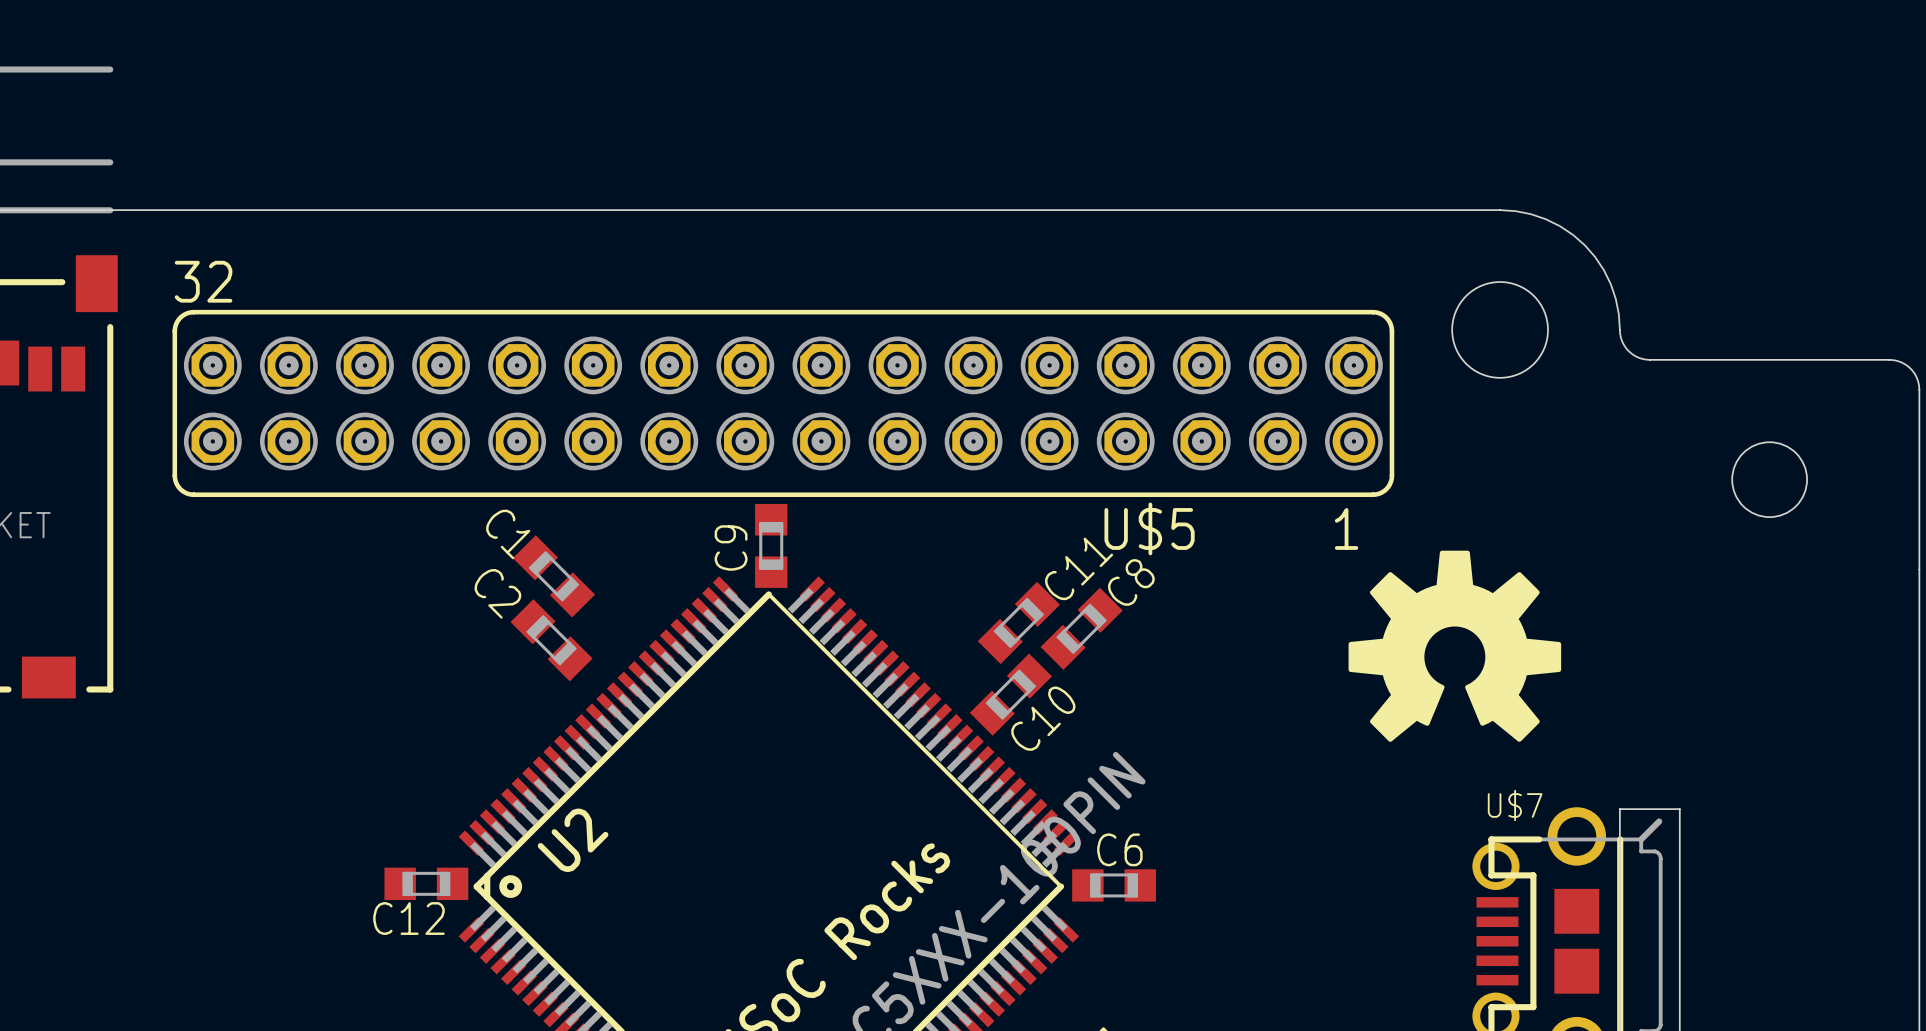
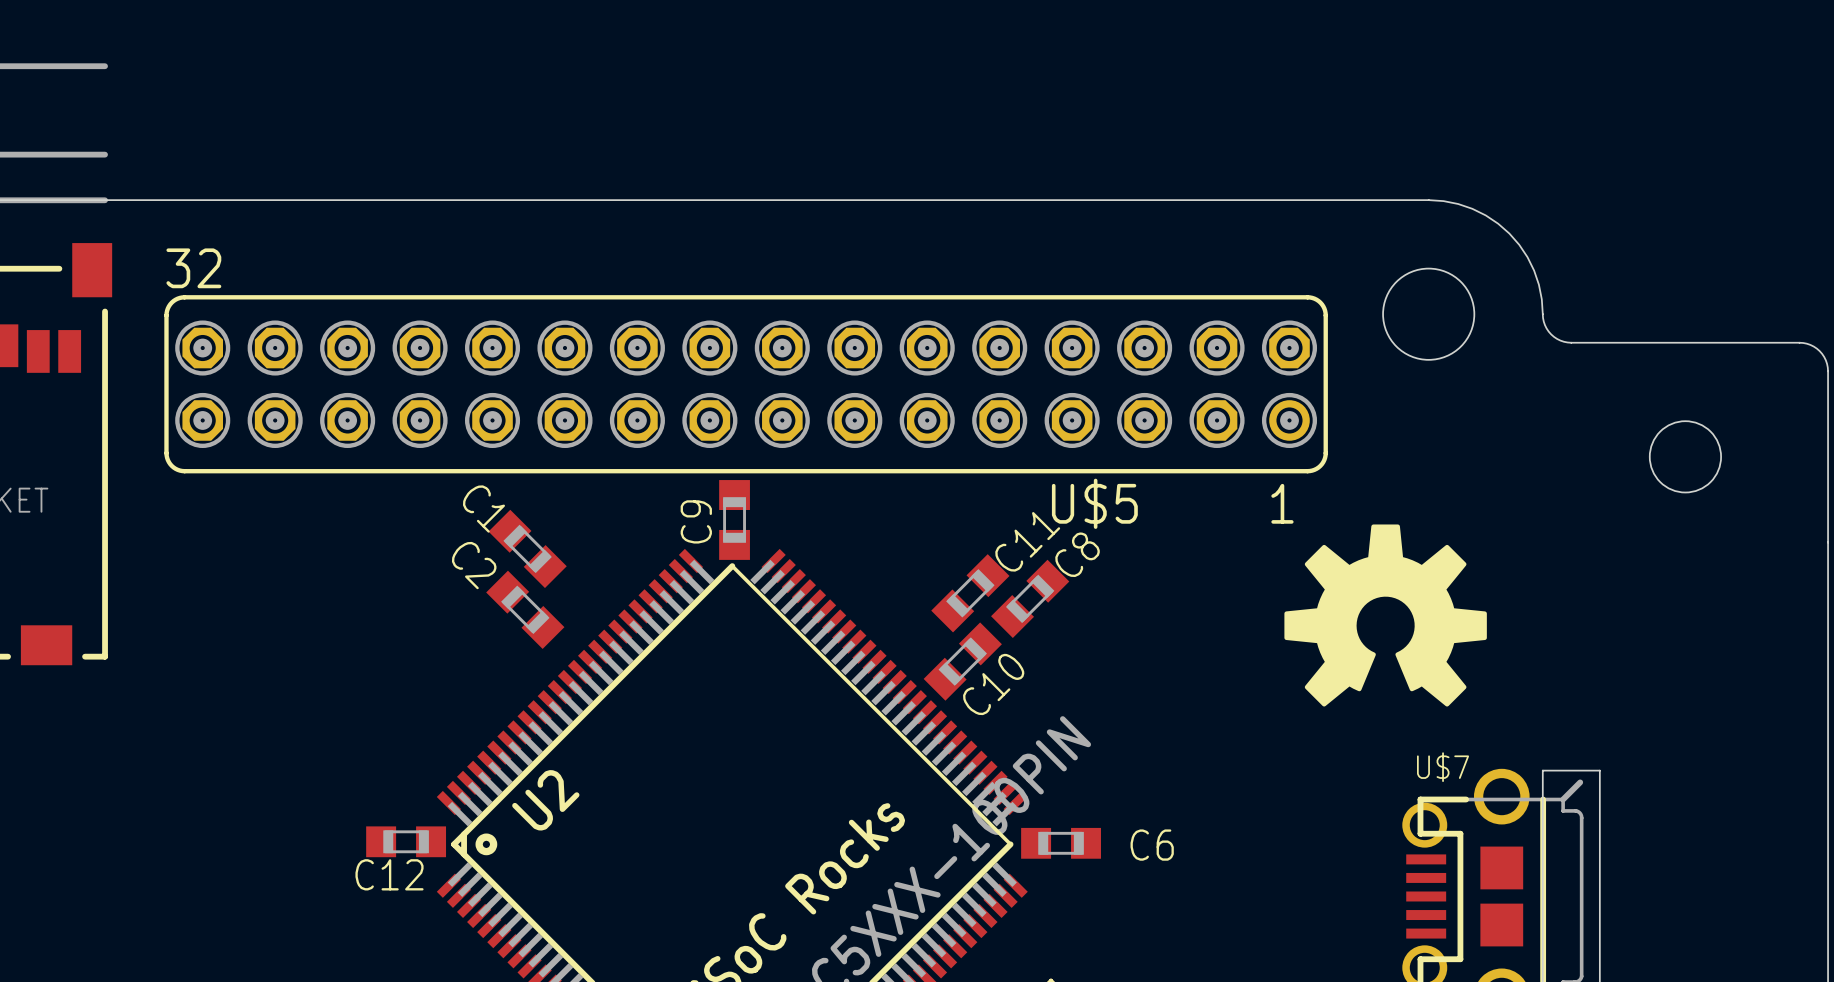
C6 name position: C6 (1119, 849) -> C6 (1152, 845)

